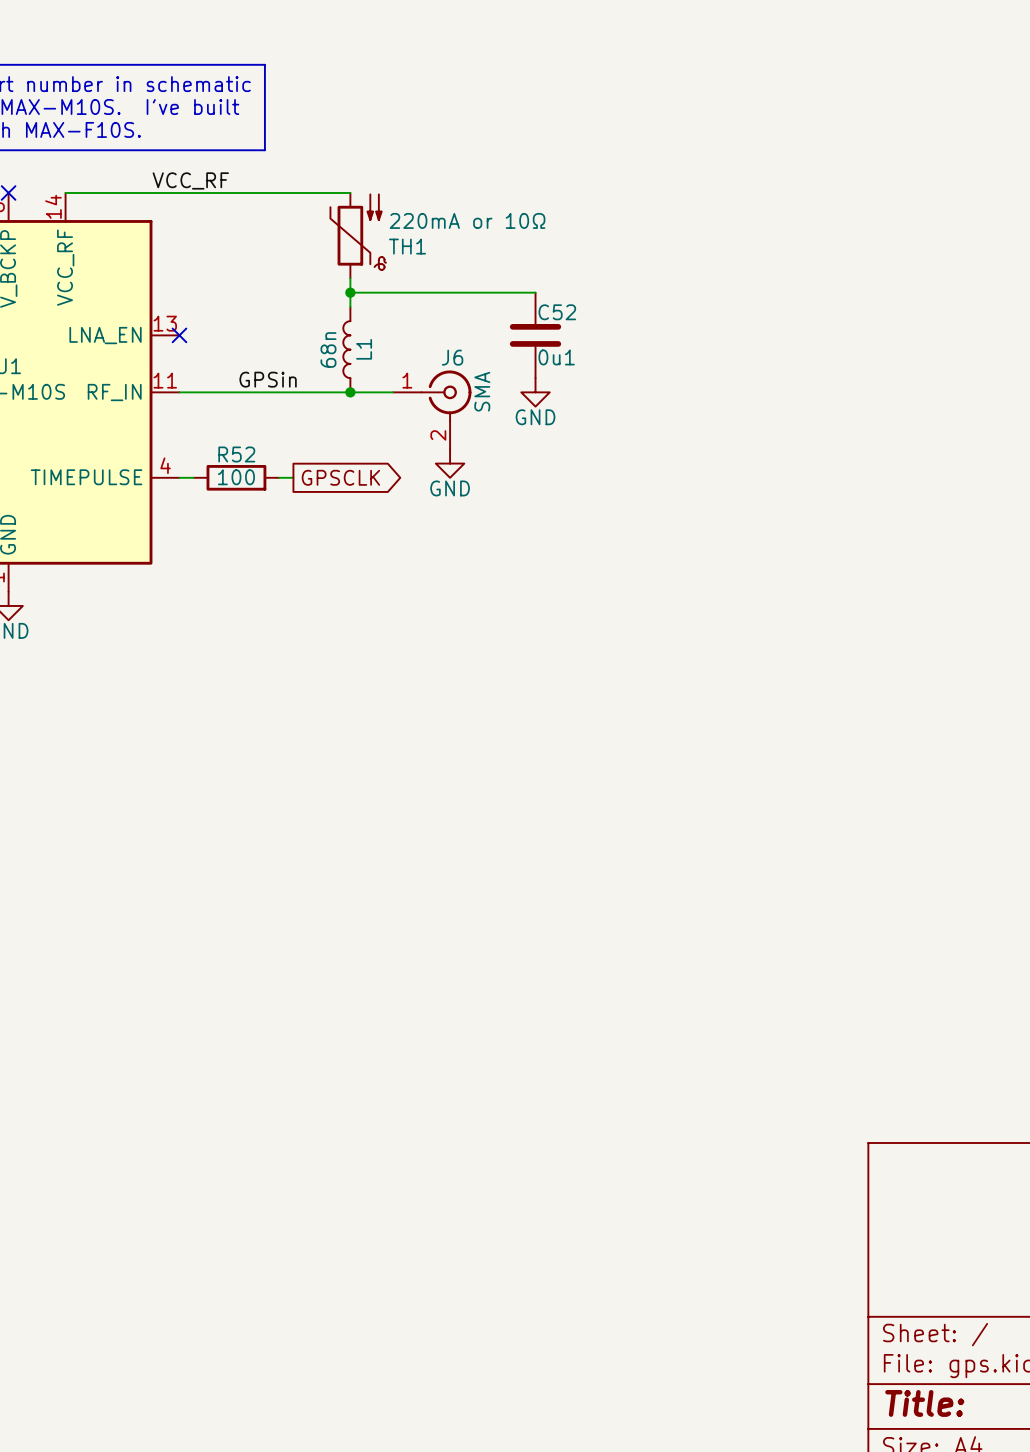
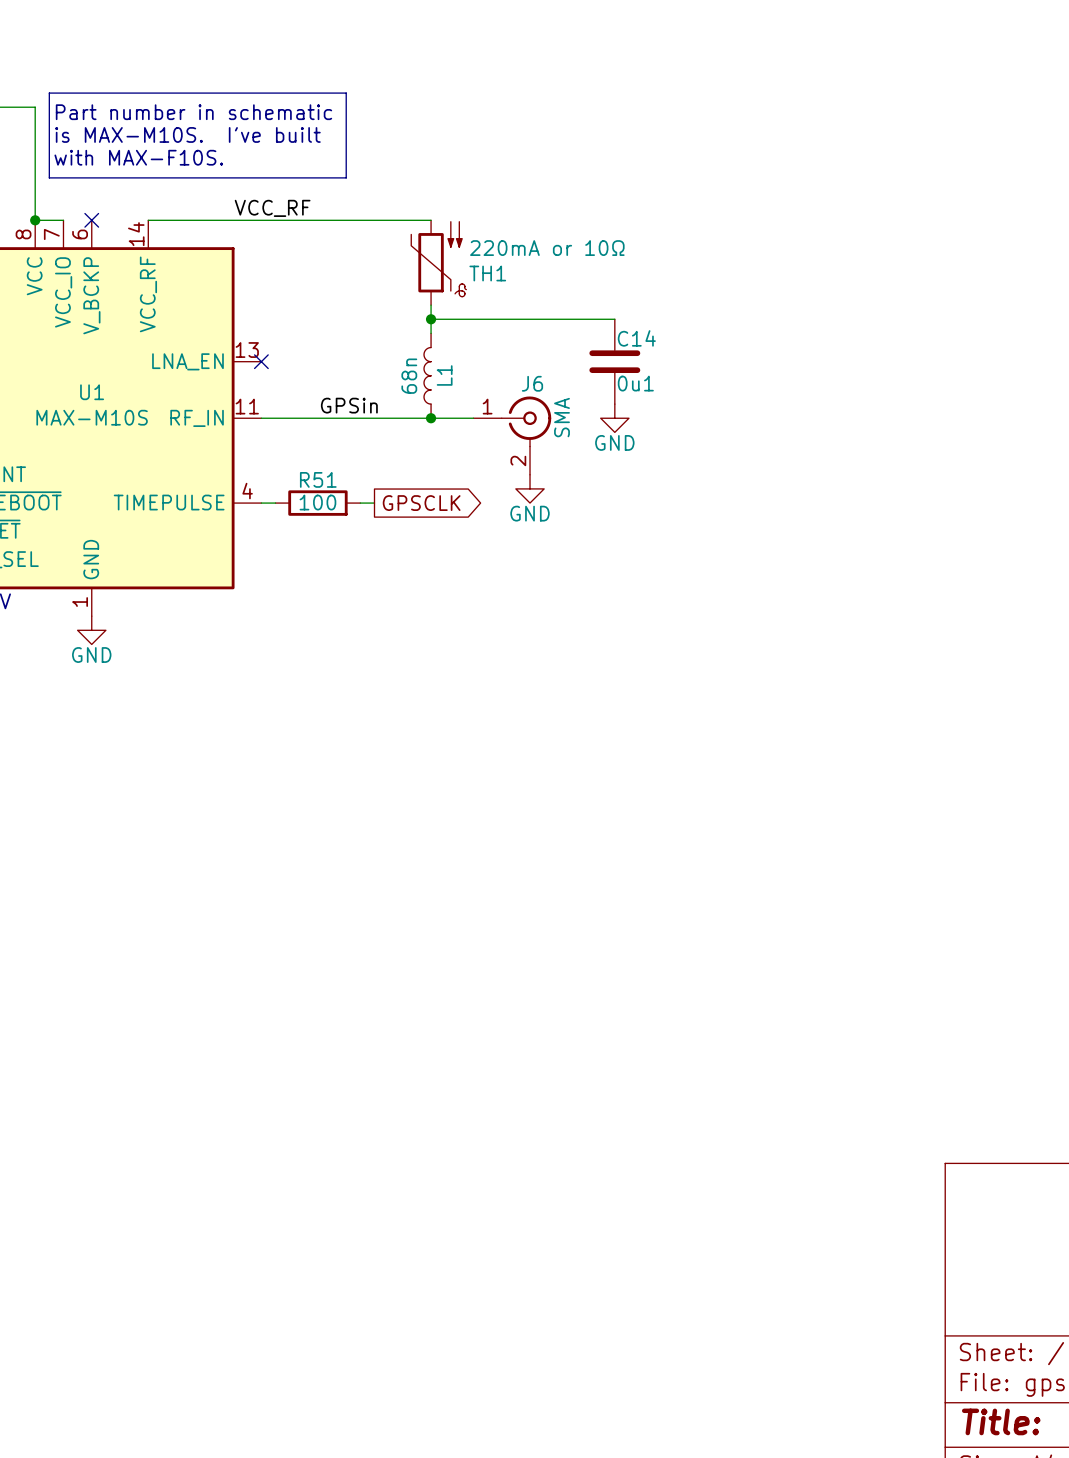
C52 name: C52 (557, 312) -> C14 (636, 338)
R52 name: R52 (236, 454) -> R51 (318, 479)

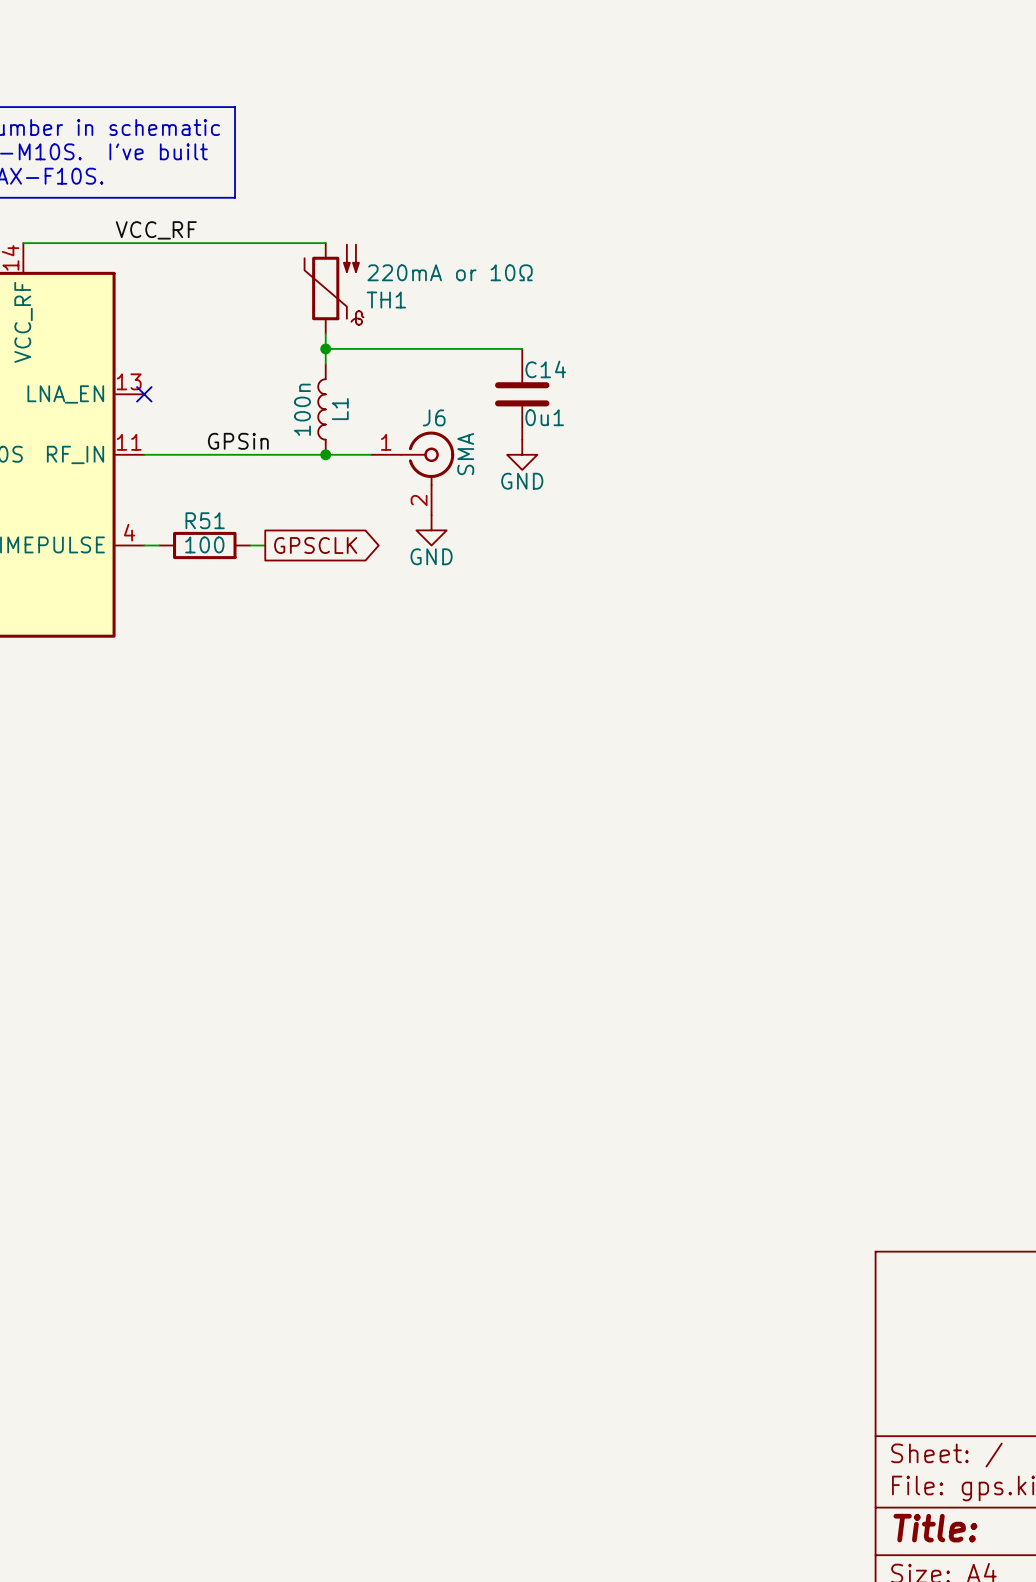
L1 value: 68n (409, 376) -> 100n (302, 409)

